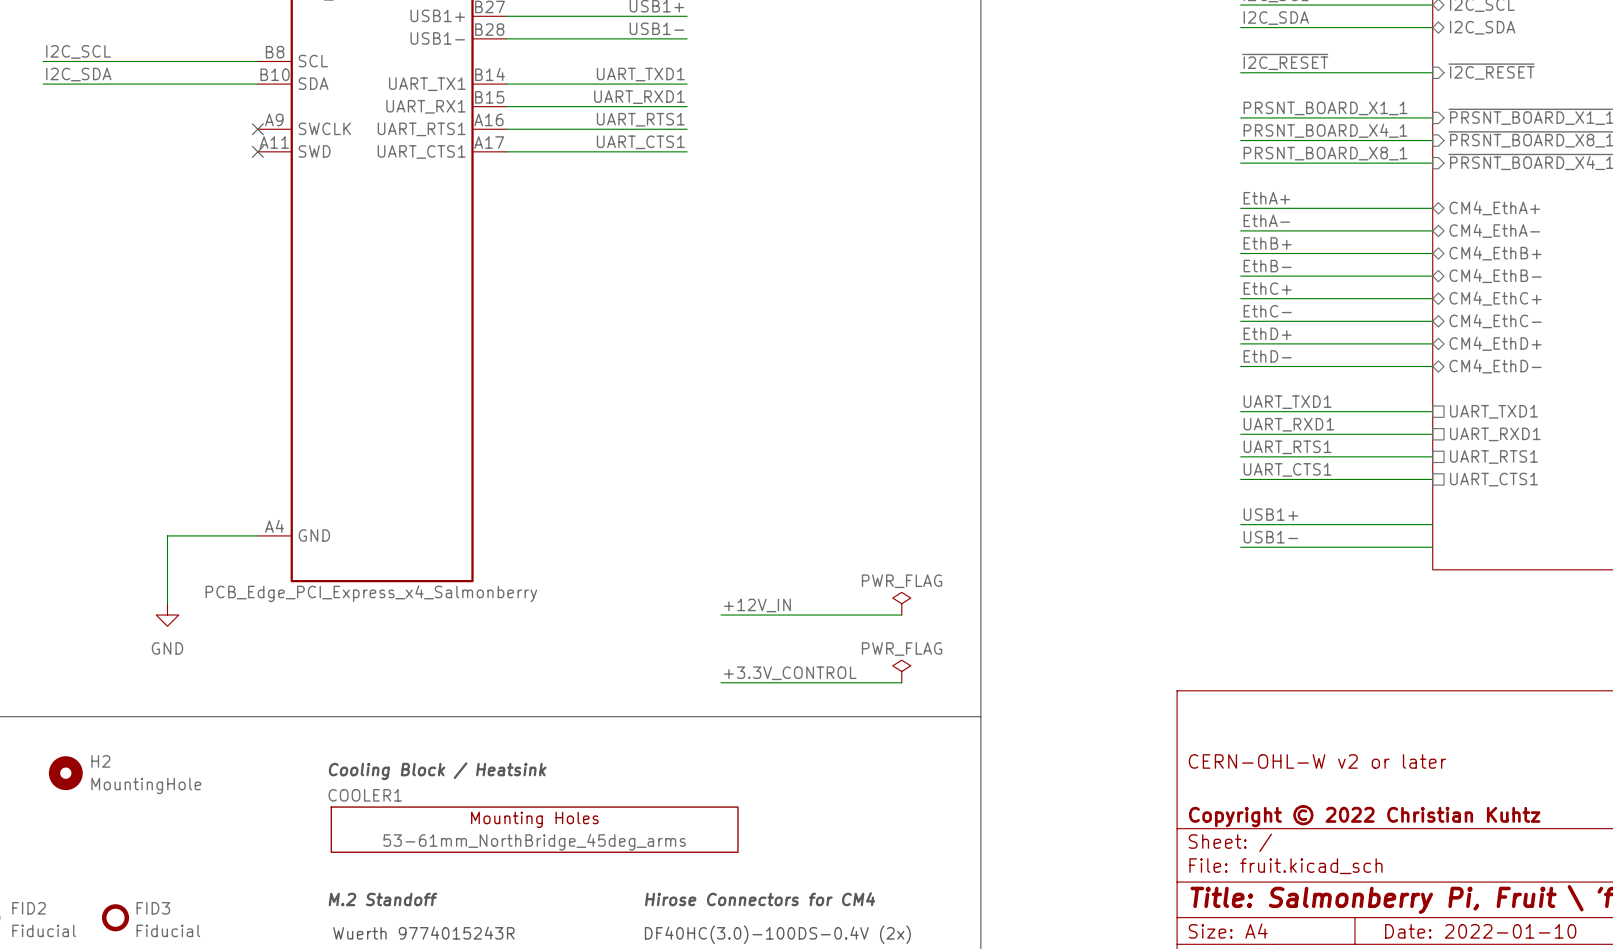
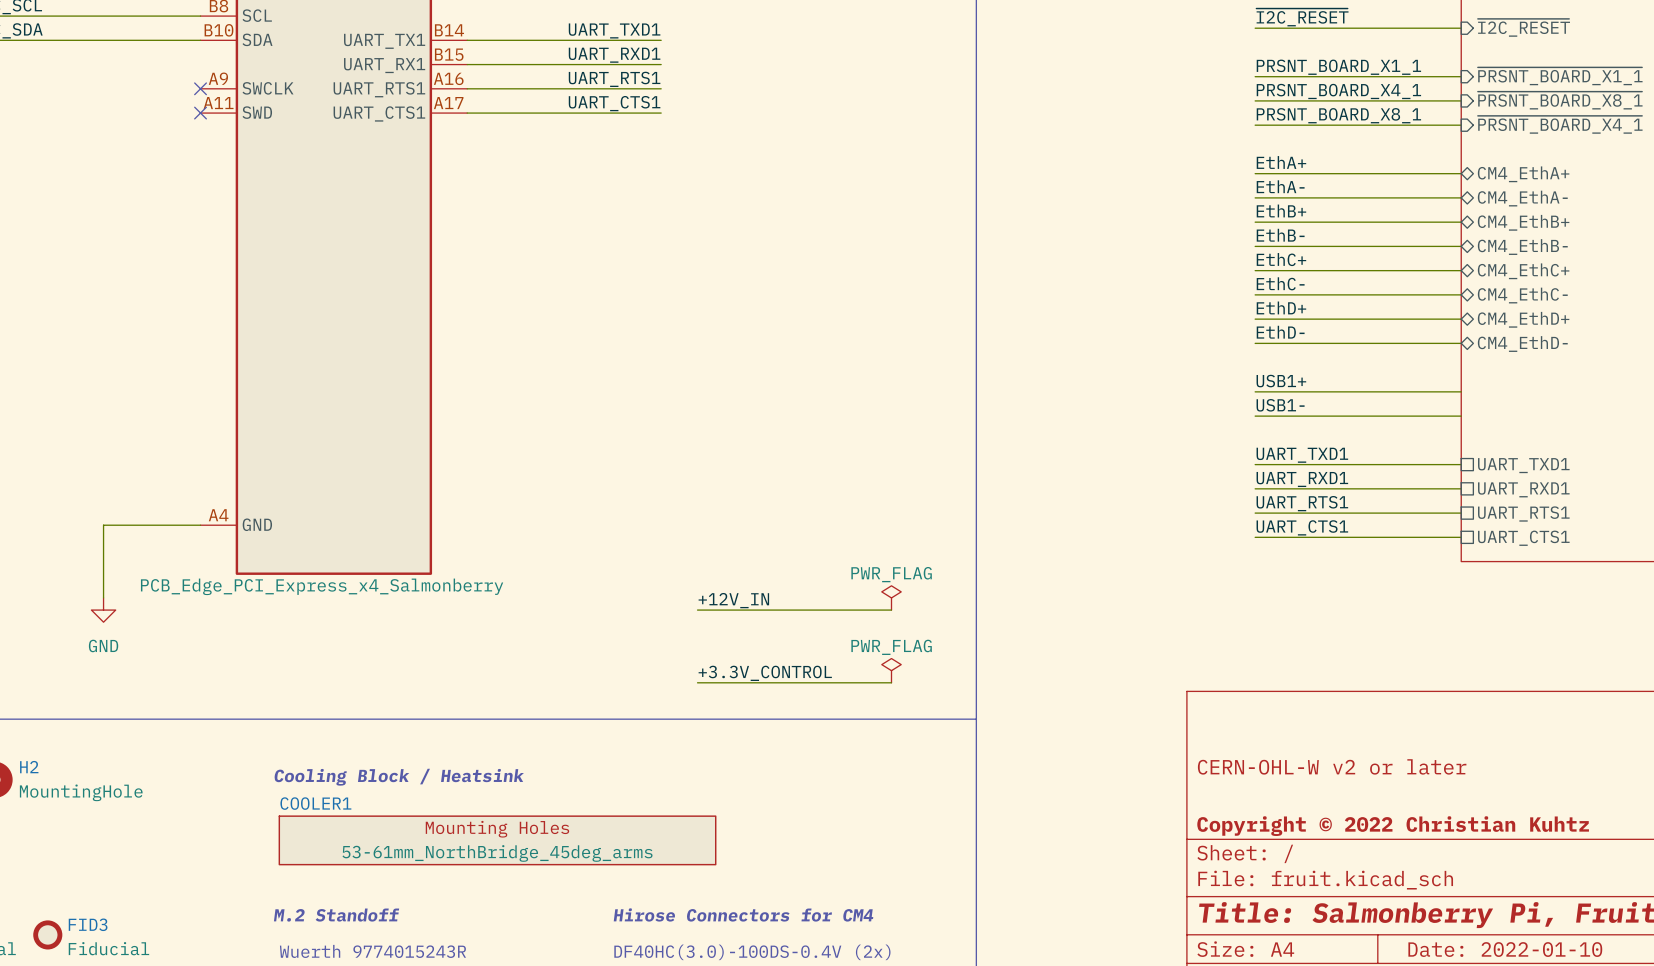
label: UART_TXD1 (1287, 402) -> USB1+ (1281, 381)
sheet pin: UART_TXD1 (1493, 411) -> none
label: UART_RXD1 (1288, 424) -> USB1- (1280, 405)
sheet pin position: UART_RXD1 (1495, 434) -> UART_RXD1 (1523, 489)
label: UART_RTS1 (1287, 447) -> none
wire: (1240, 456) (1432, 456) -> (1255, 488) (1461, 488)
sheet pin position: UART_RTS1 (1493, 456) -> UART_RTS1 (1523, 514)
label: UART_CTS1 (1287, 469) -> UART_TXD1 (1302, 455)
sheet pin: UART_CTS1 (1493, 479) -> UART_TXD1 (1523, 465)
label: none -> UART_RXD1 (1302, 479)
label: USB1+ (1270, 514) -> UART_RTS1 (1302, 503)
label: USB1- (1270, 537) -> UART_CTS1 (1302, 527)
sheet pin: none -> UART_CTS1 (1523, 538)

